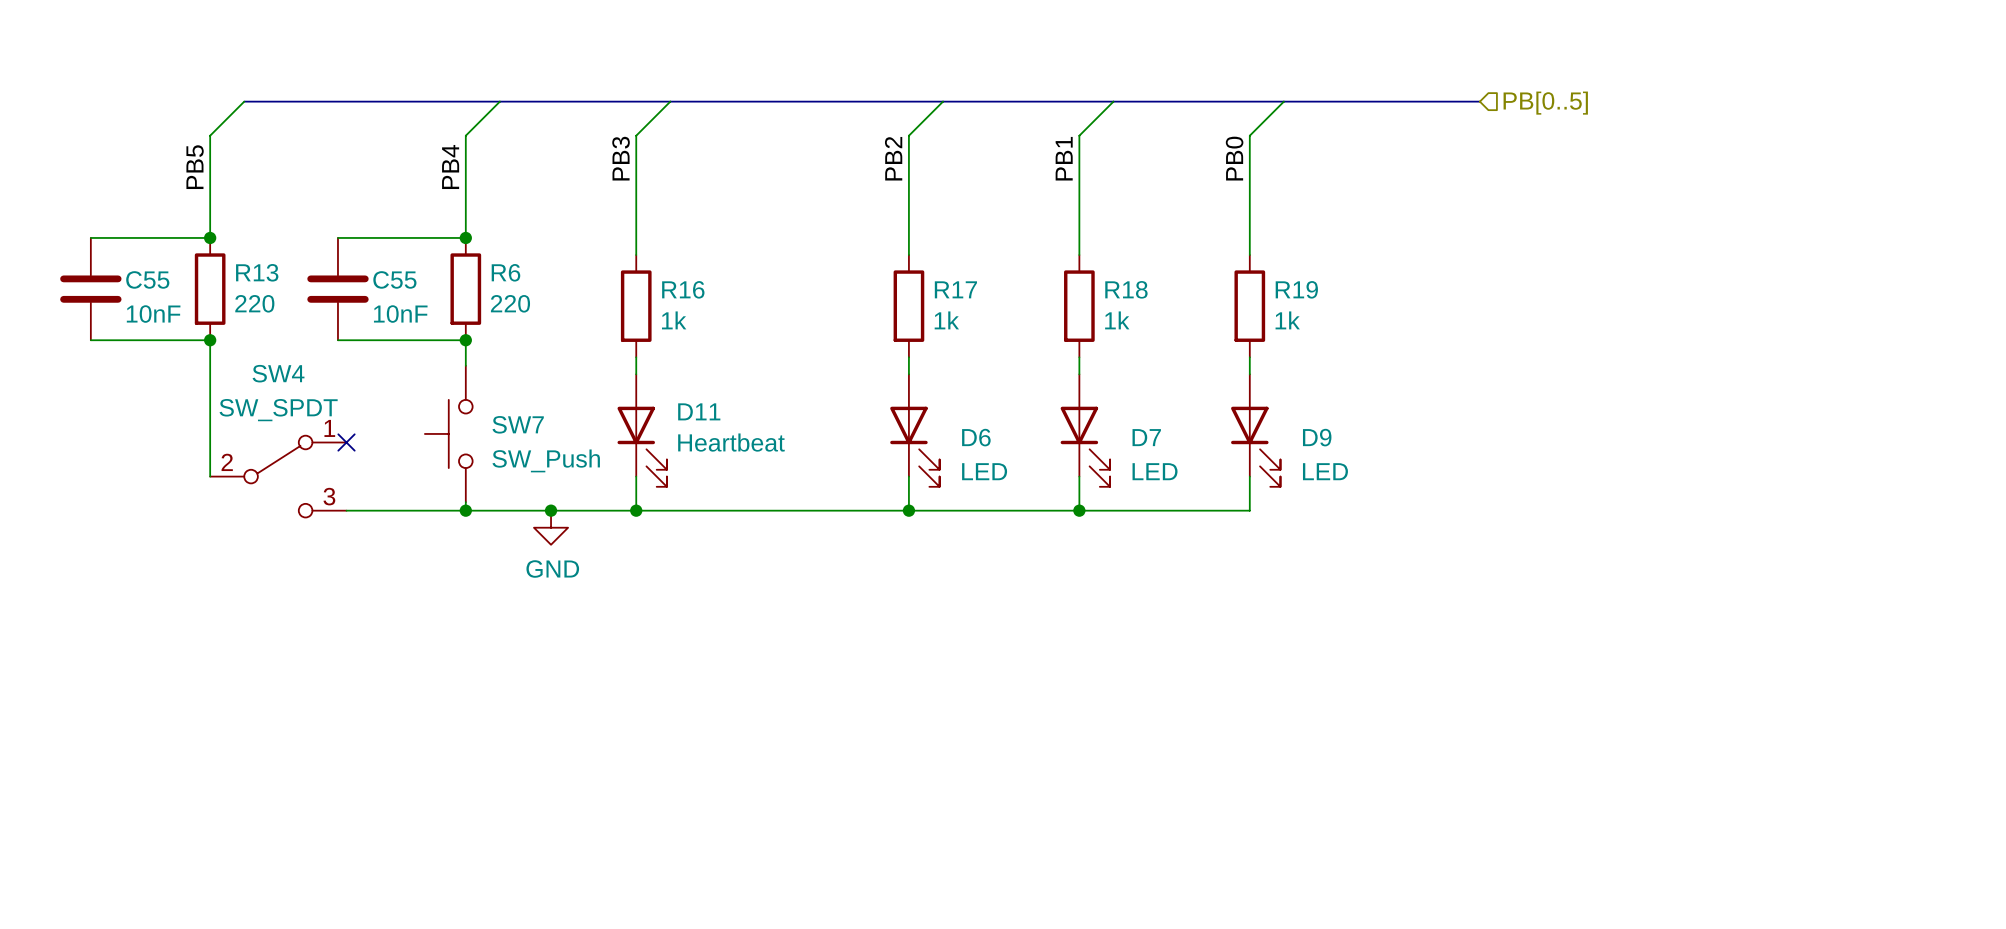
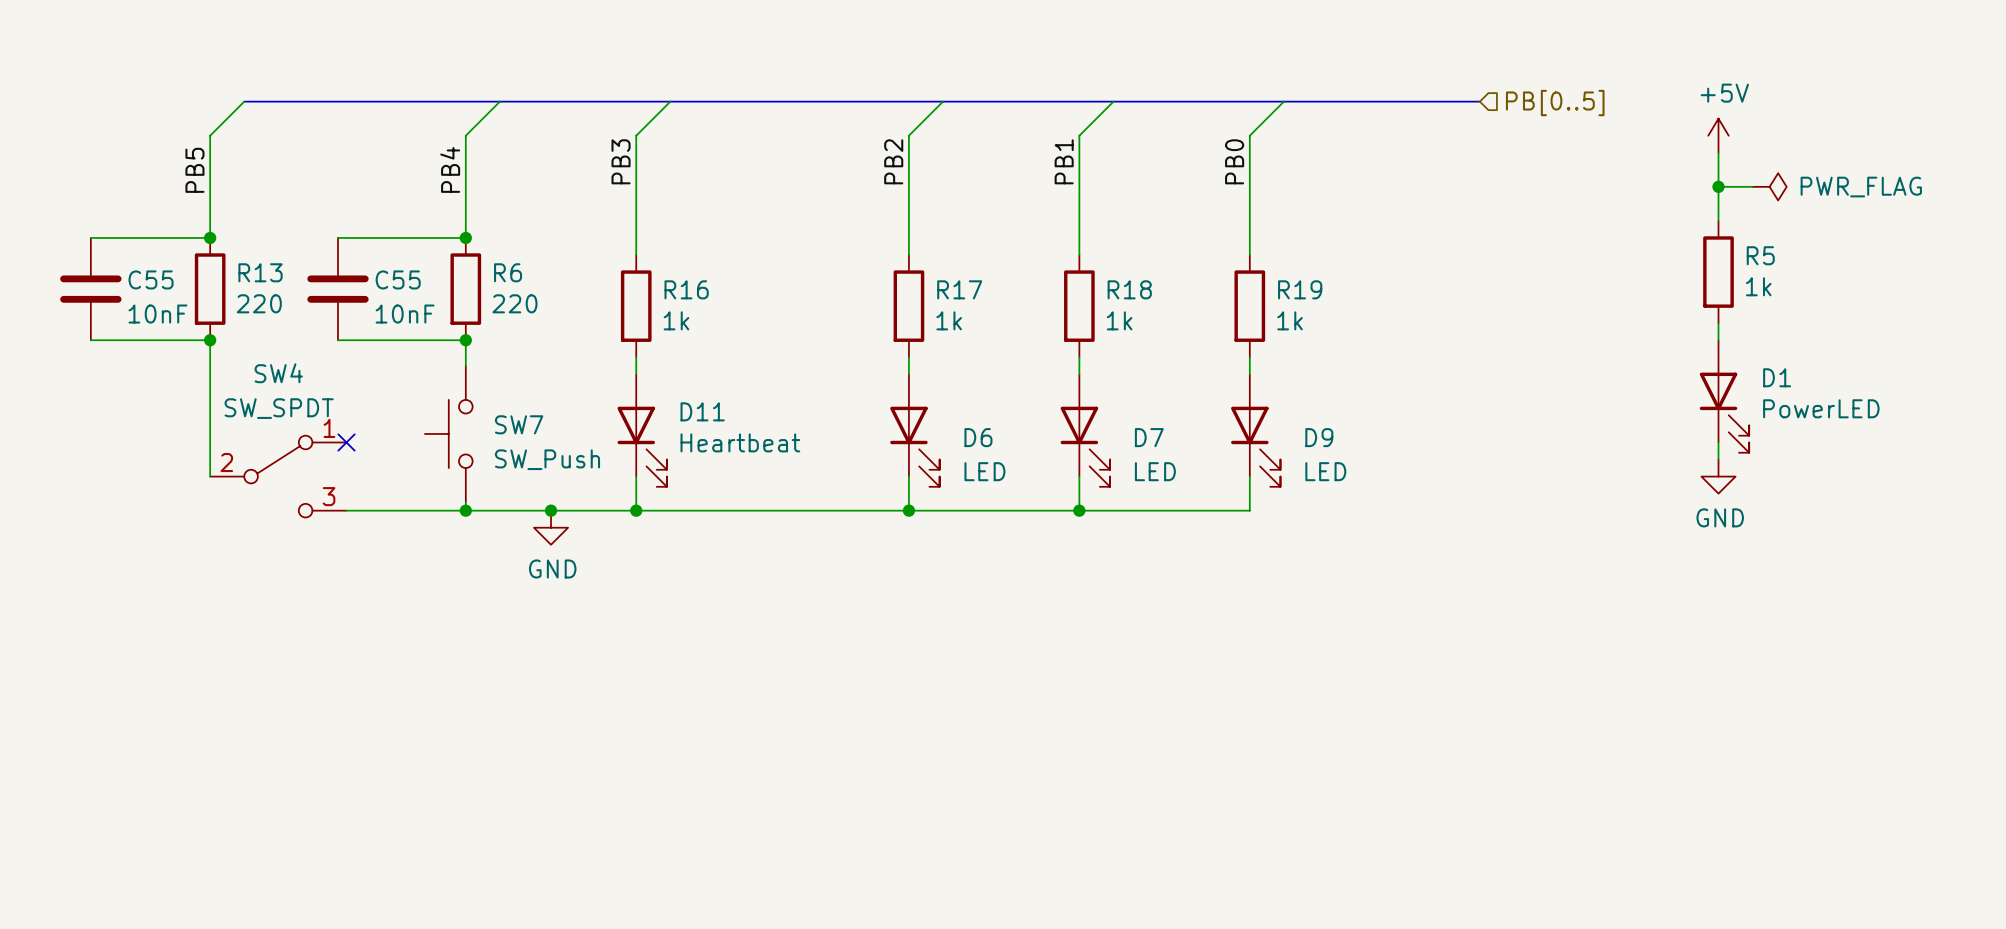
power symbol: none -> +5V (1718, 135)
wire: none -> (1718, 152) (1718, 220)
wire: none -> (1718, 186) (1752, 186)
junction: none -> (1718, 186)
power symbol: none -> PWR_FLAG (1769, 186)
R5: none -> 1k (1718, 272)
wire: none -> (1718, 323) (1718, 340)
D1: none -> PowerLED (1724, 396)
wire: none -> (1718, 442) (1718, 459)
power symbol: none -> GND (1718, 476)

